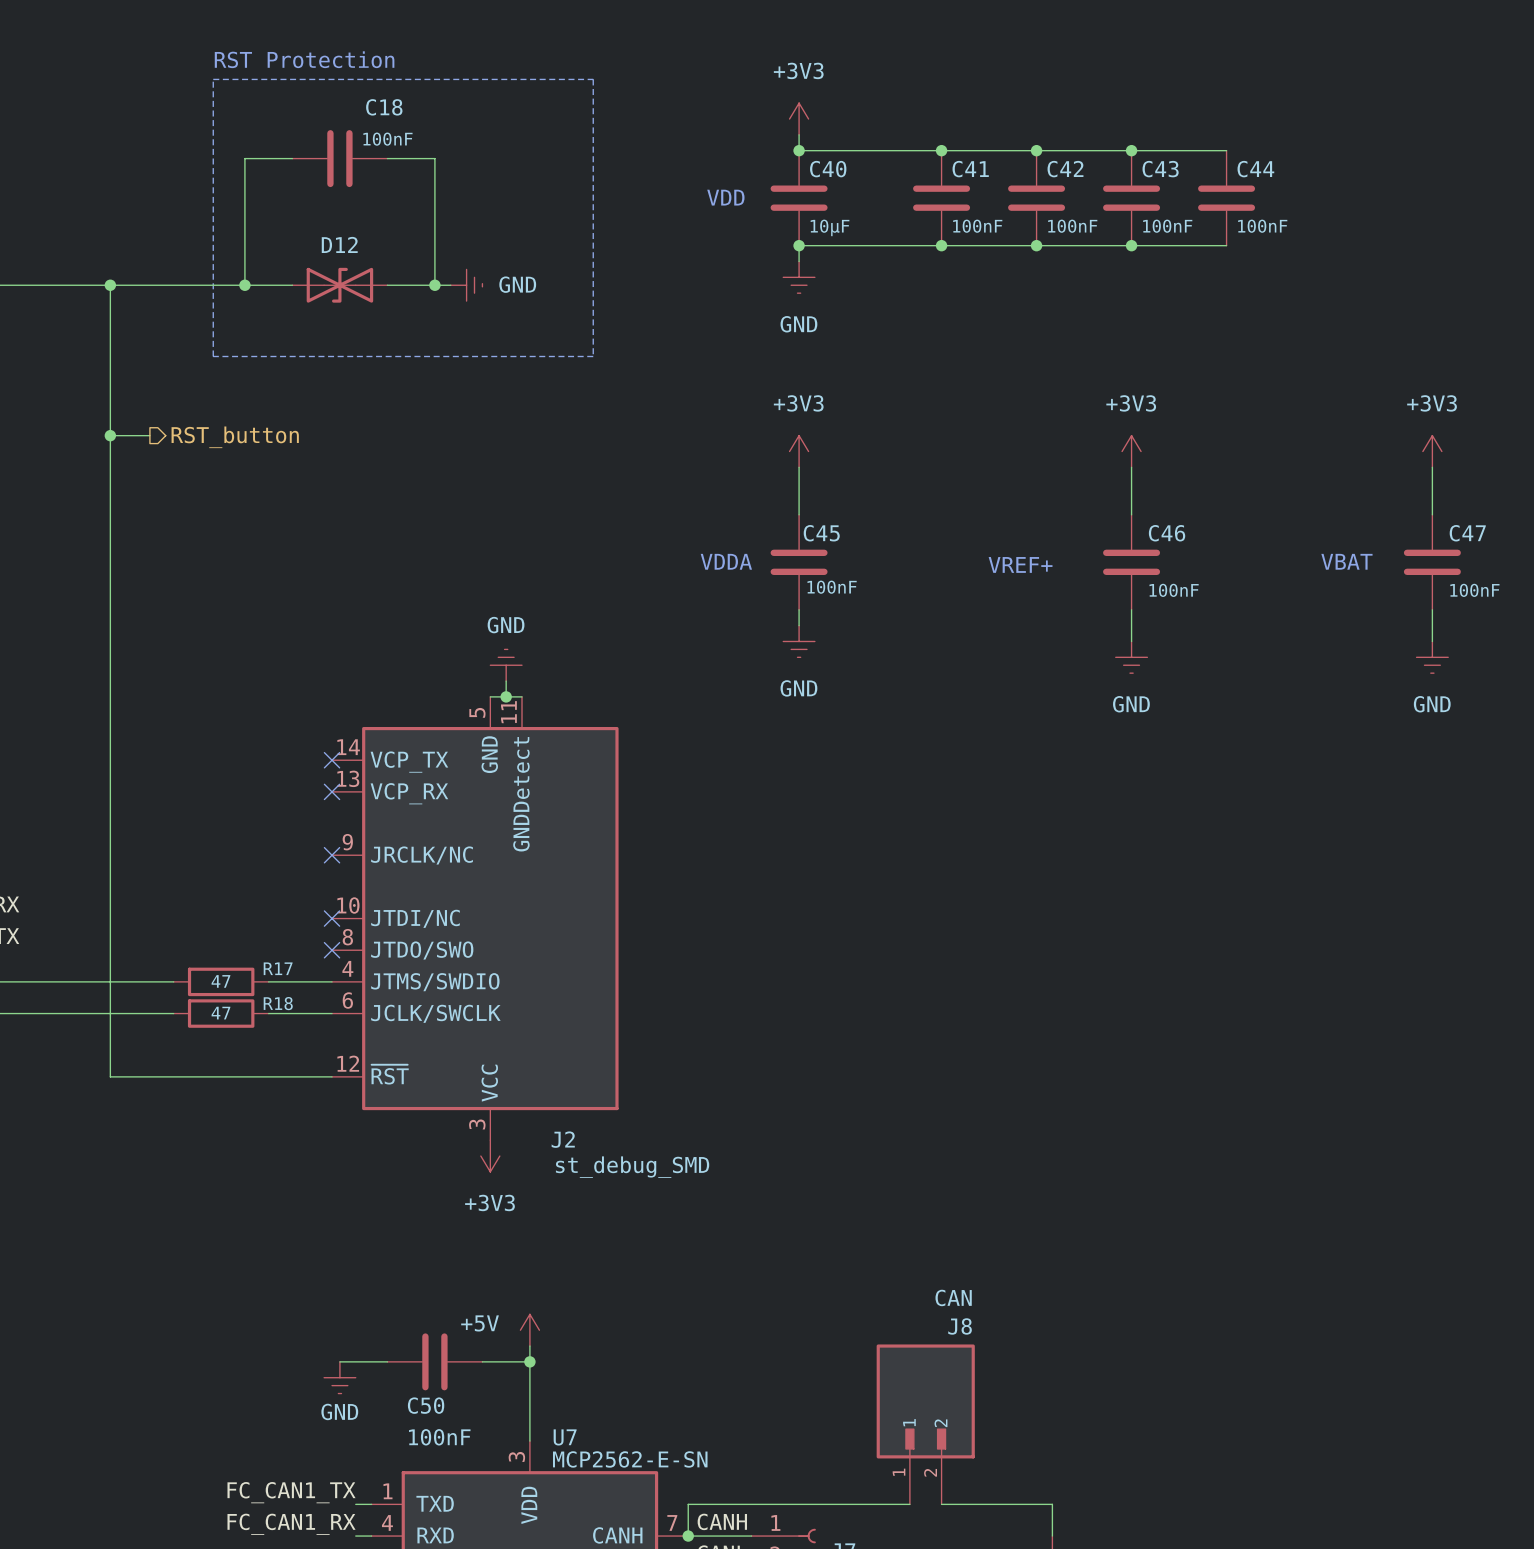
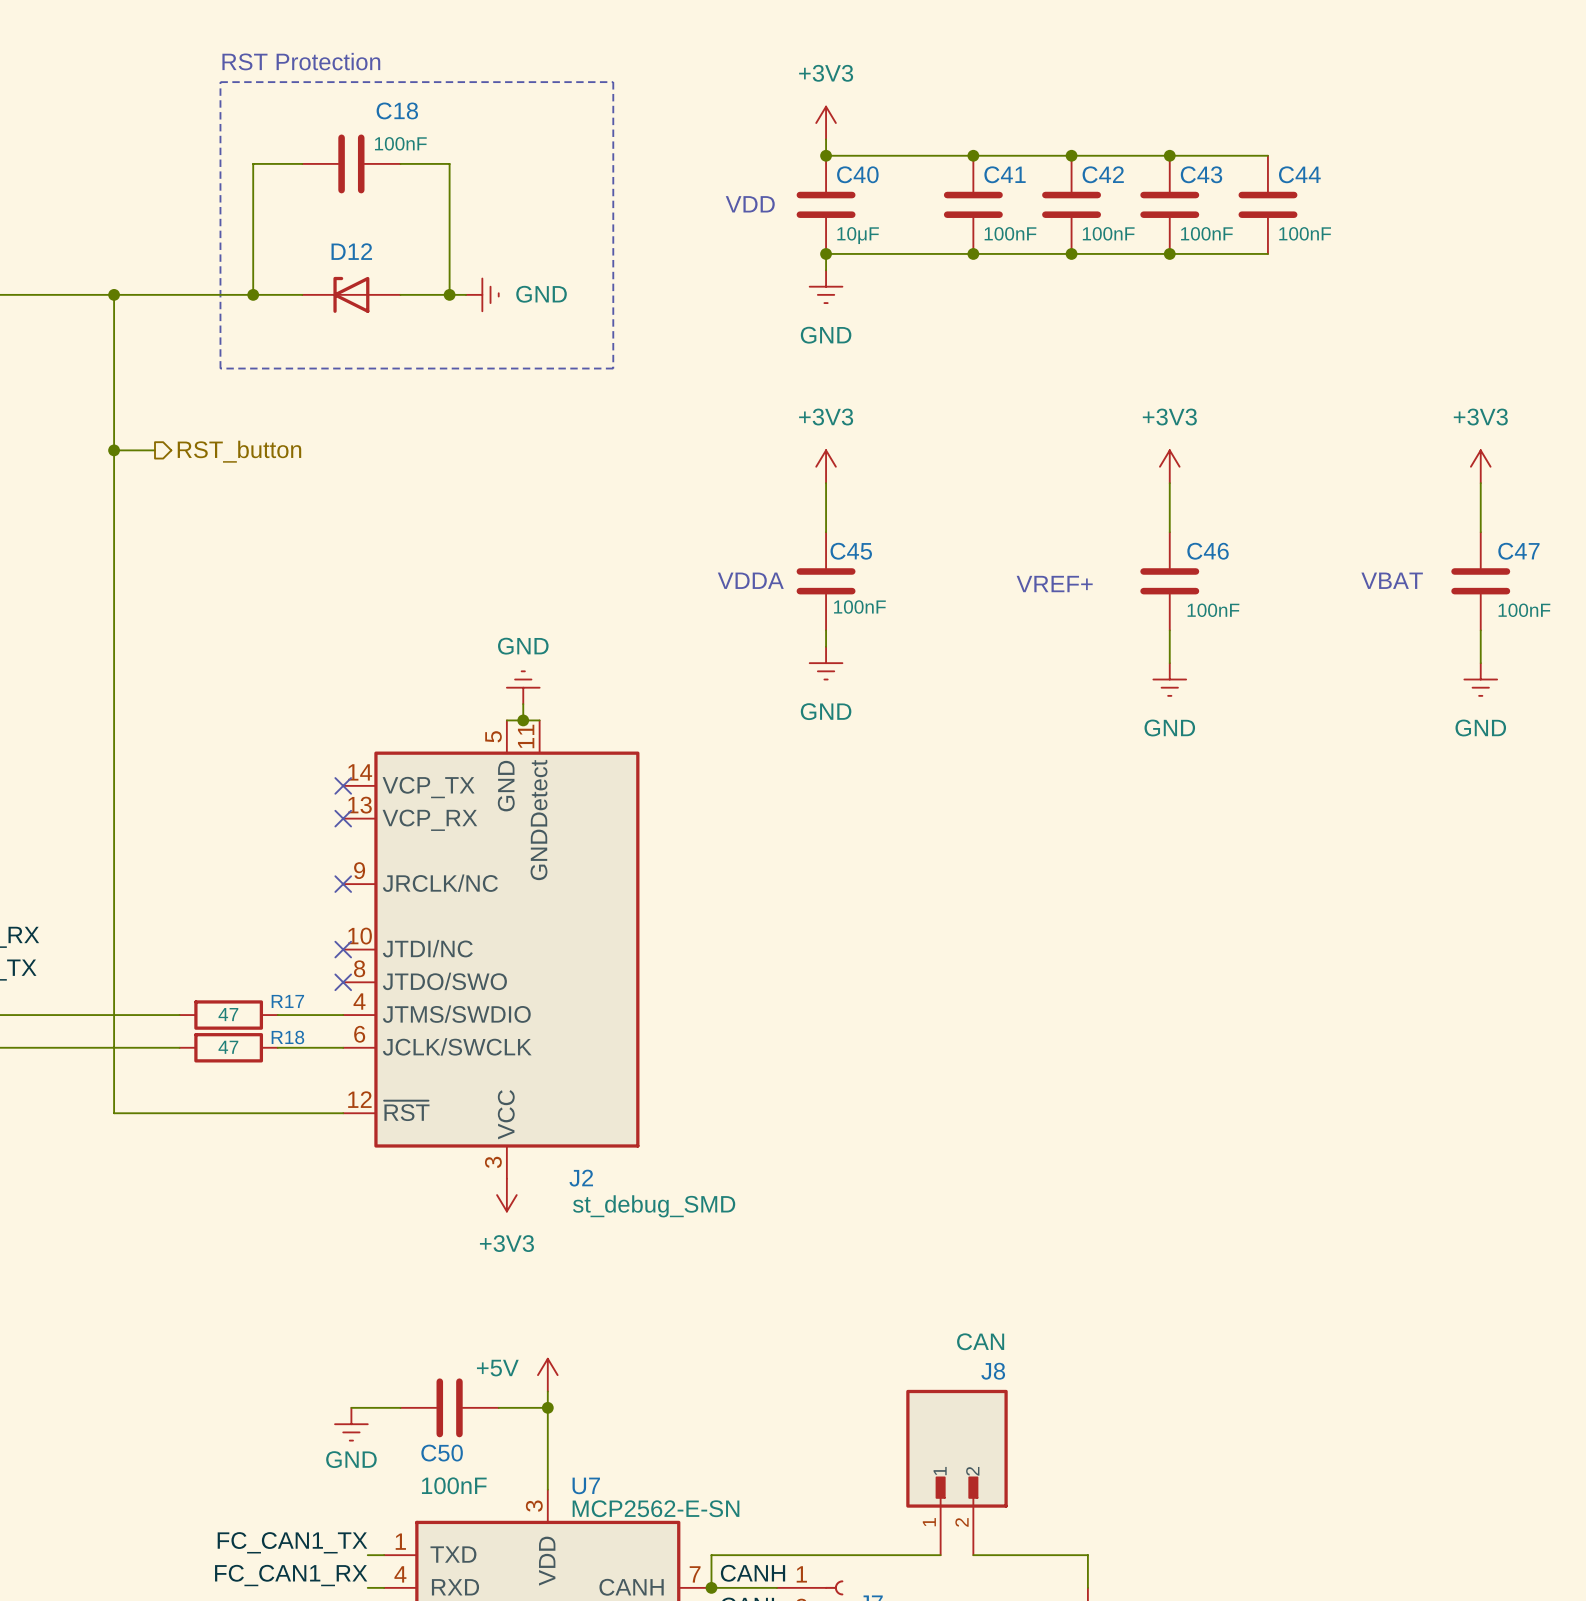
D12 symbol: [292, 267, 388, 303] -> [302, 276, 401, 313]

